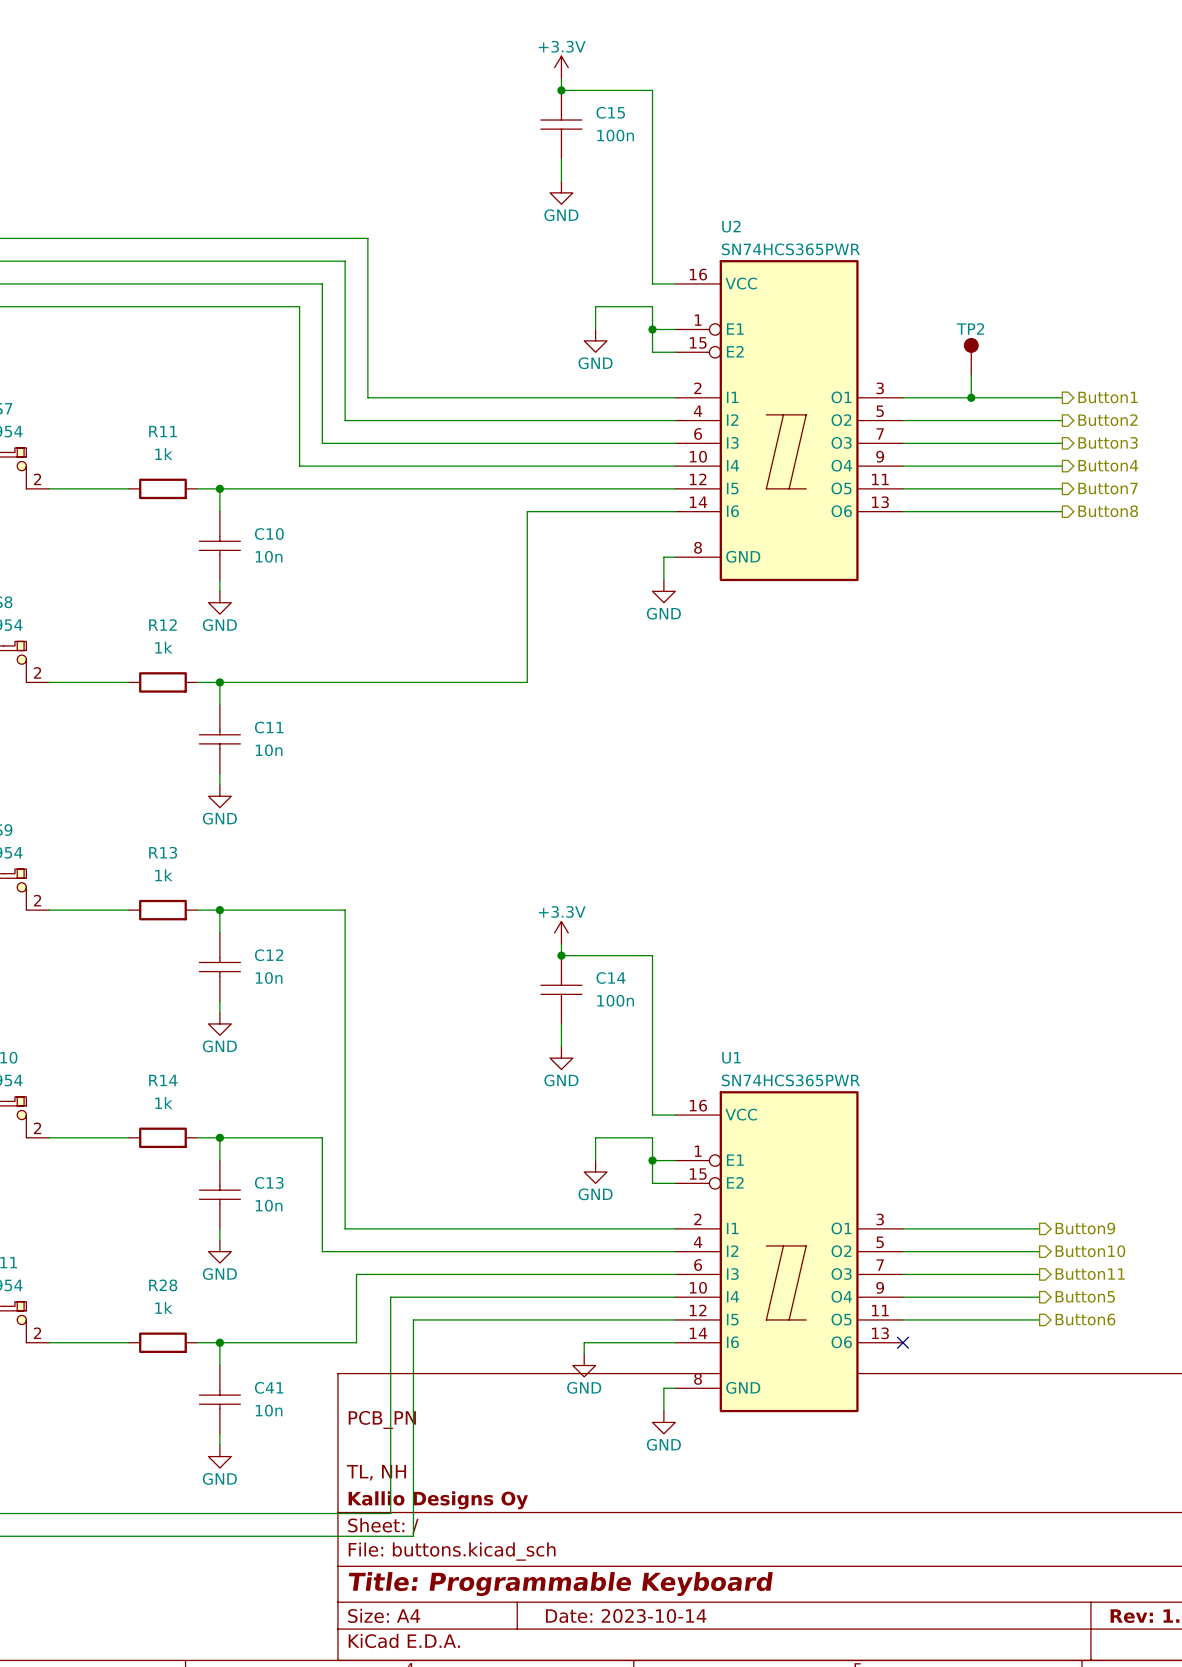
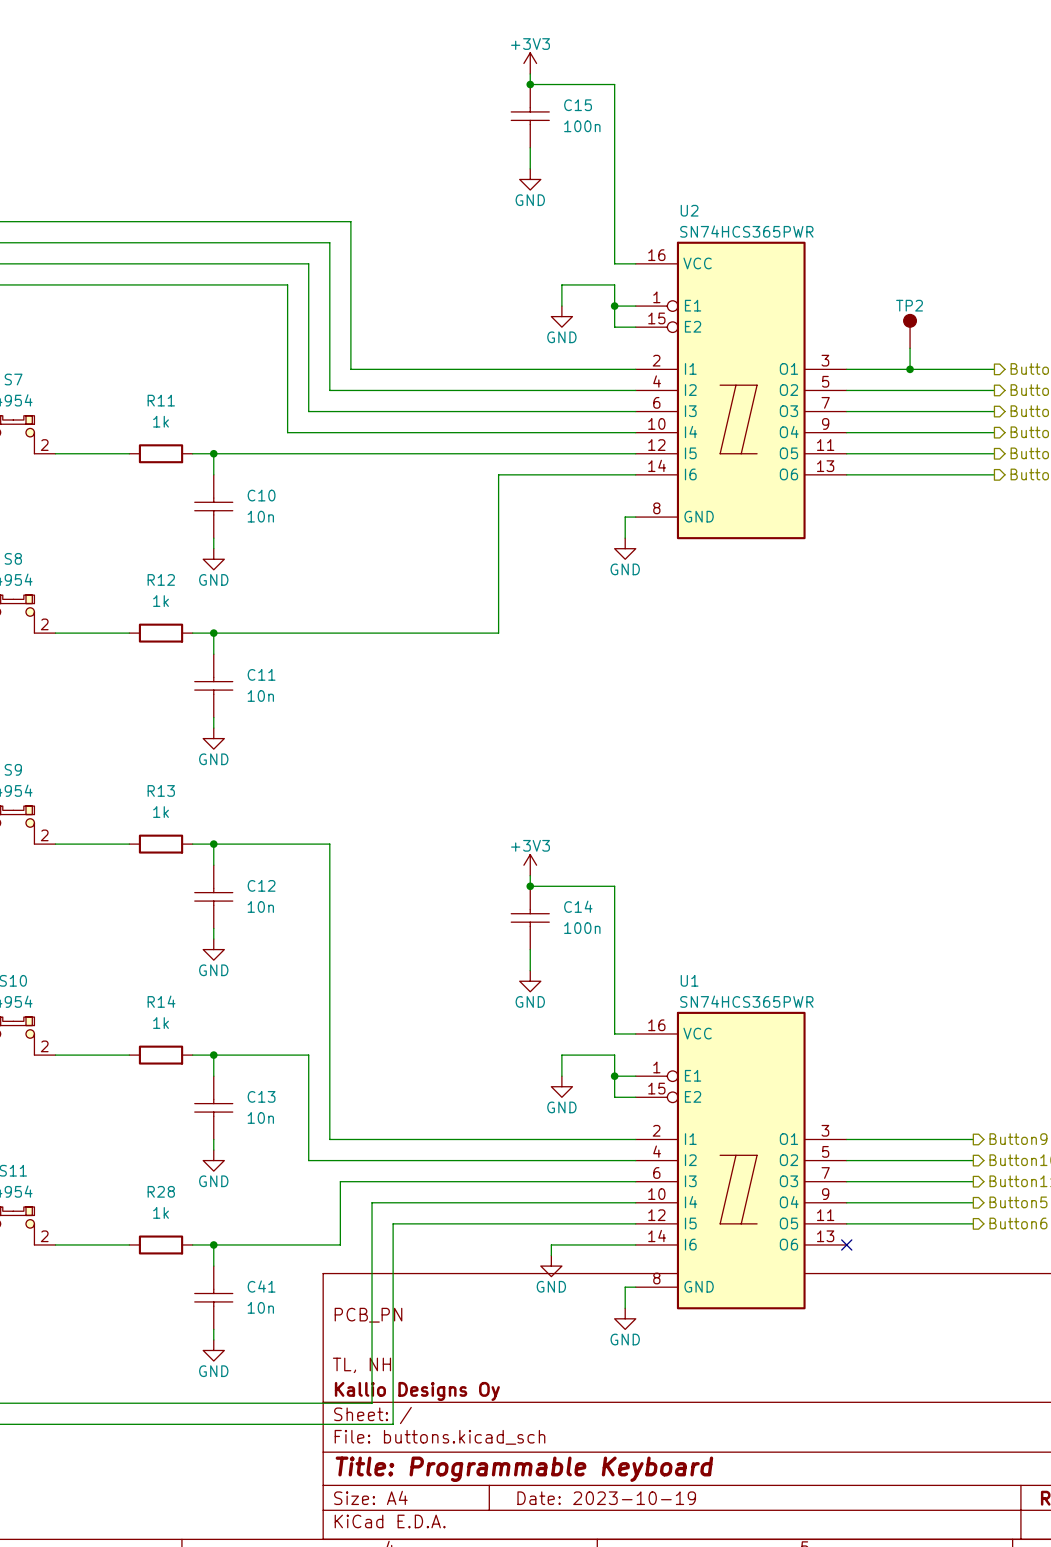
power symbol: +3.3V (561, 67) -> +3V3 (530, 63)
power symbol: +3.3V (561, 932) -> +3V3 (530, 865)
title block: Date: 2023-10-14 (626, 1616) -> Date: 2023-10-19 (606, 1498)

